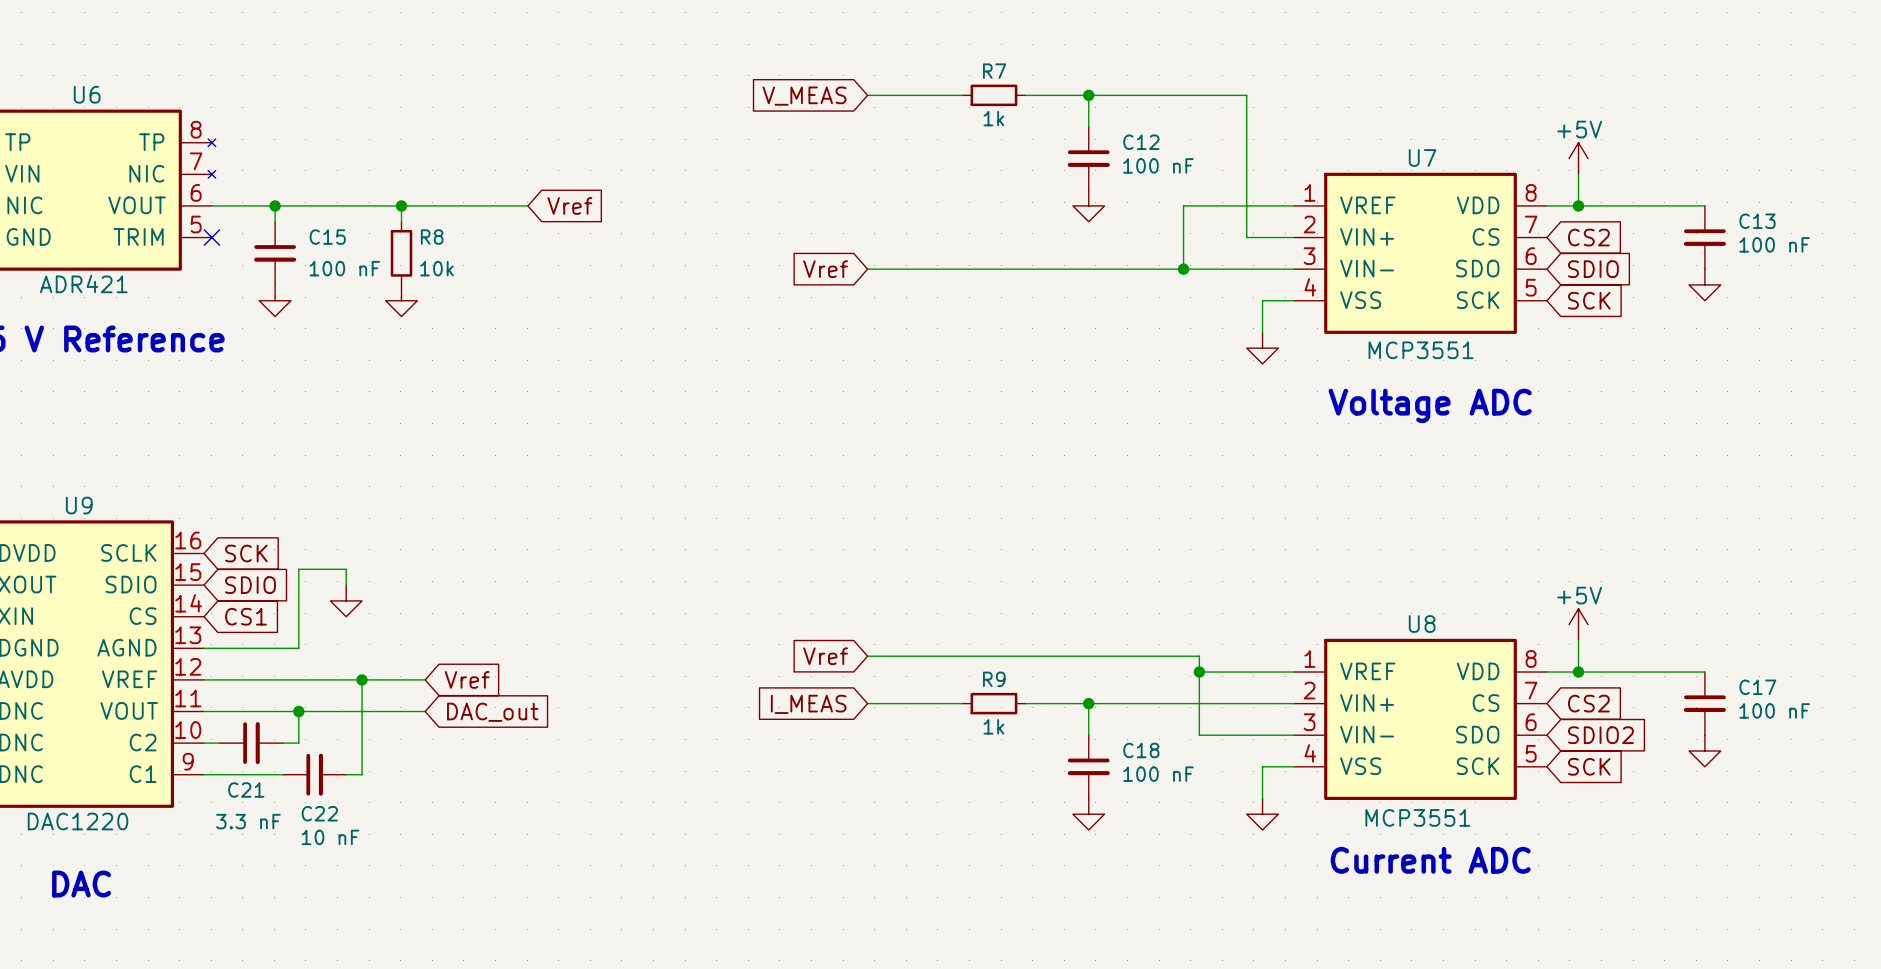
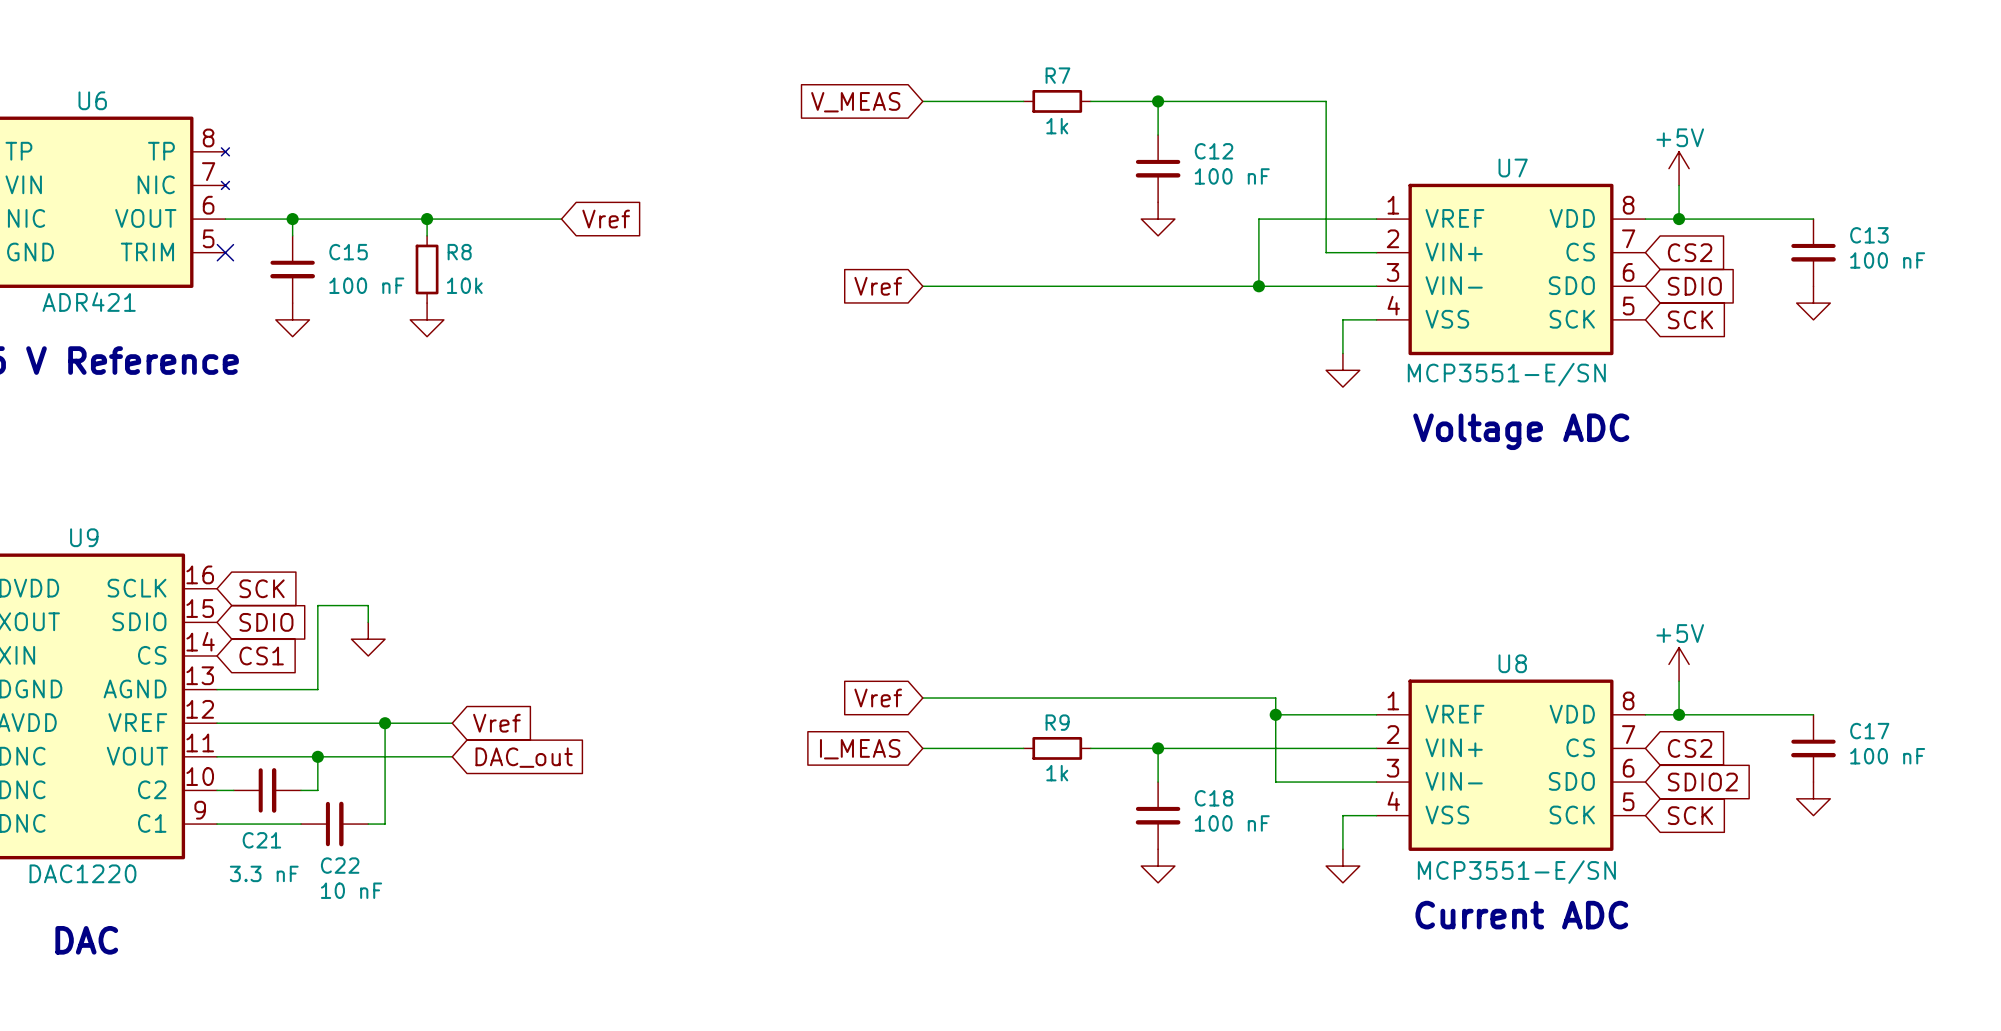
U7 value: MCP3551 (1421, 350) -> MCP3551-E/SN (1506, 374)
U8 value: MCP3551 (1417, 817) -> MCP3551-E/SN (1516, 872)

